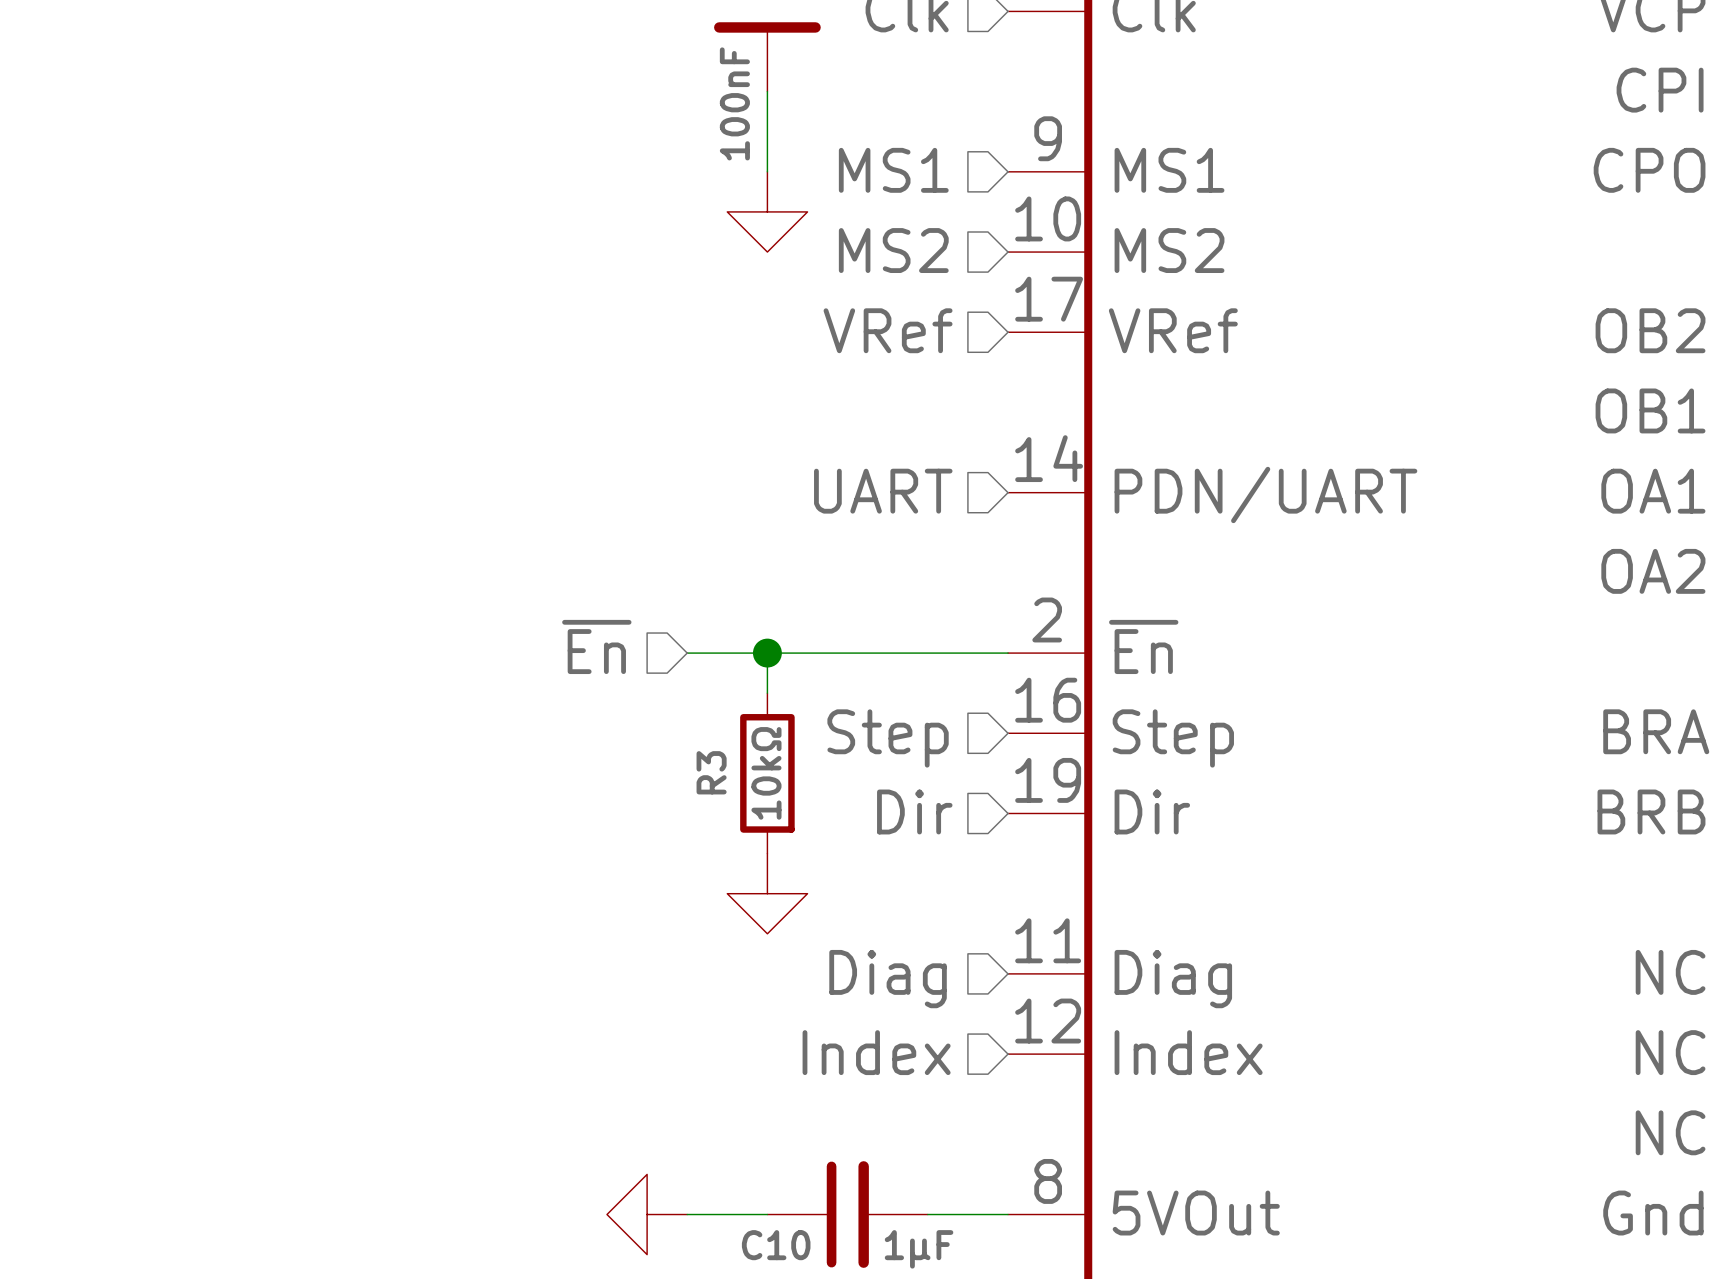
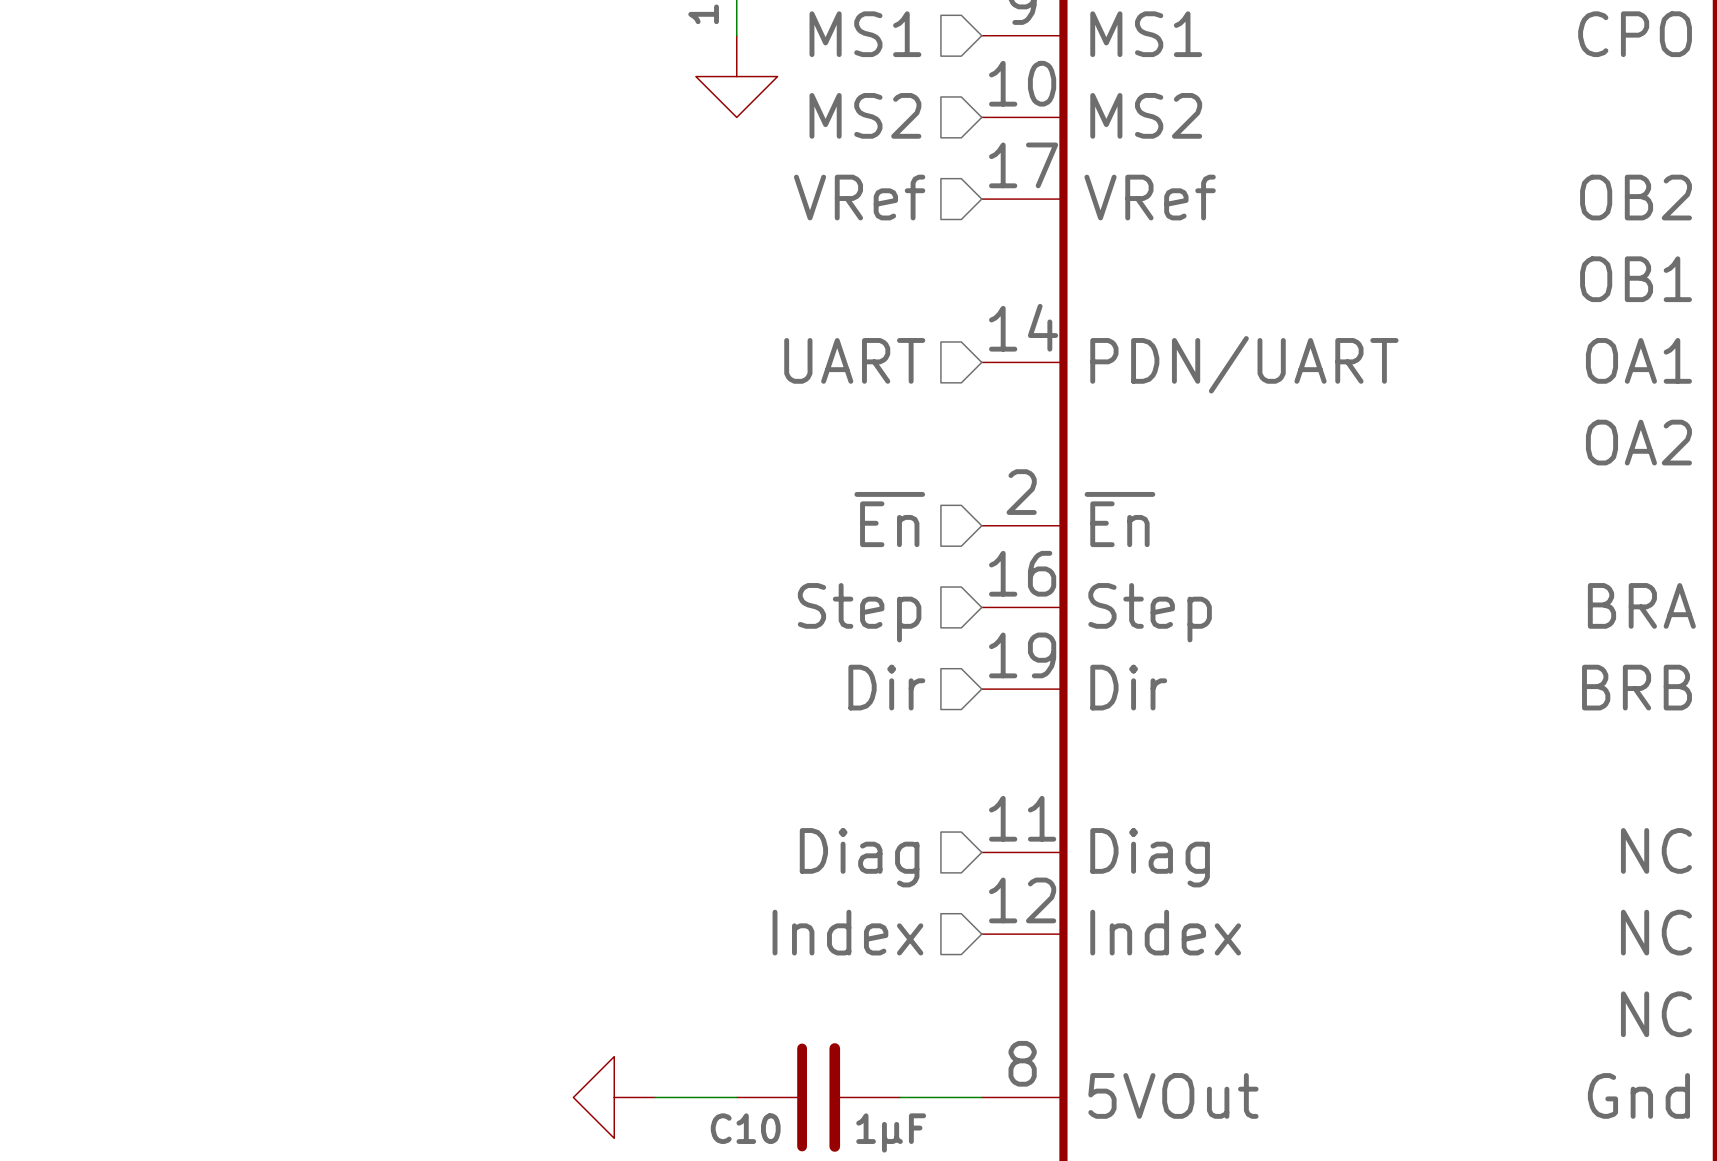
hierarchical label position: ~{En} (596, 646) -> ~{En} (889, 519)
wire: (687, 653) (1008, 653) -> none
wire: (767, 653) (767, 693) -> none
junction: (767, 653) -> none
R3: 10kΩ (767, 773) -> none
power symbol: (767, 893) -> none

